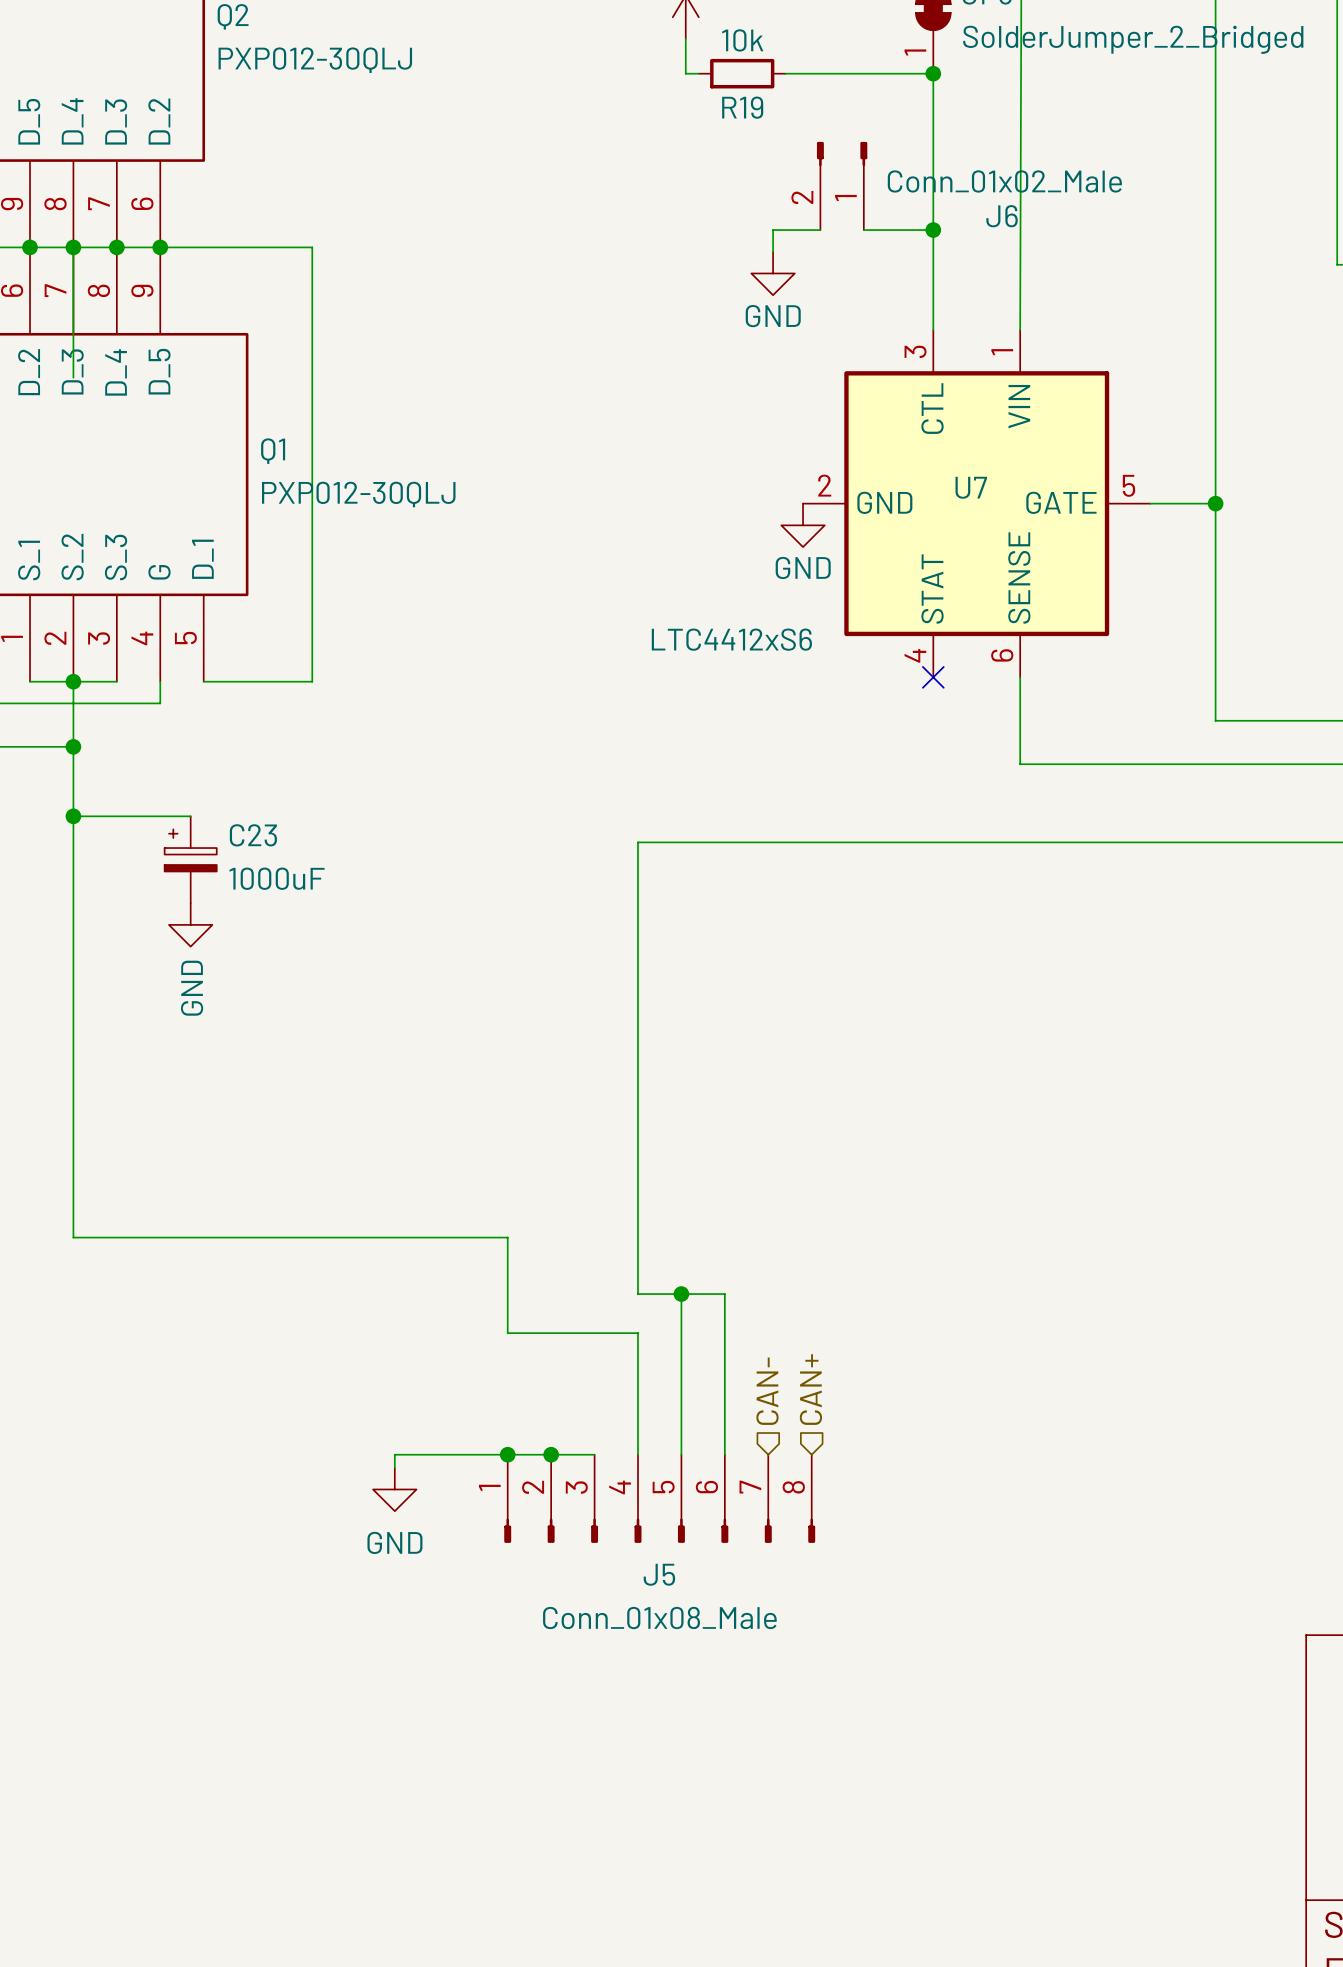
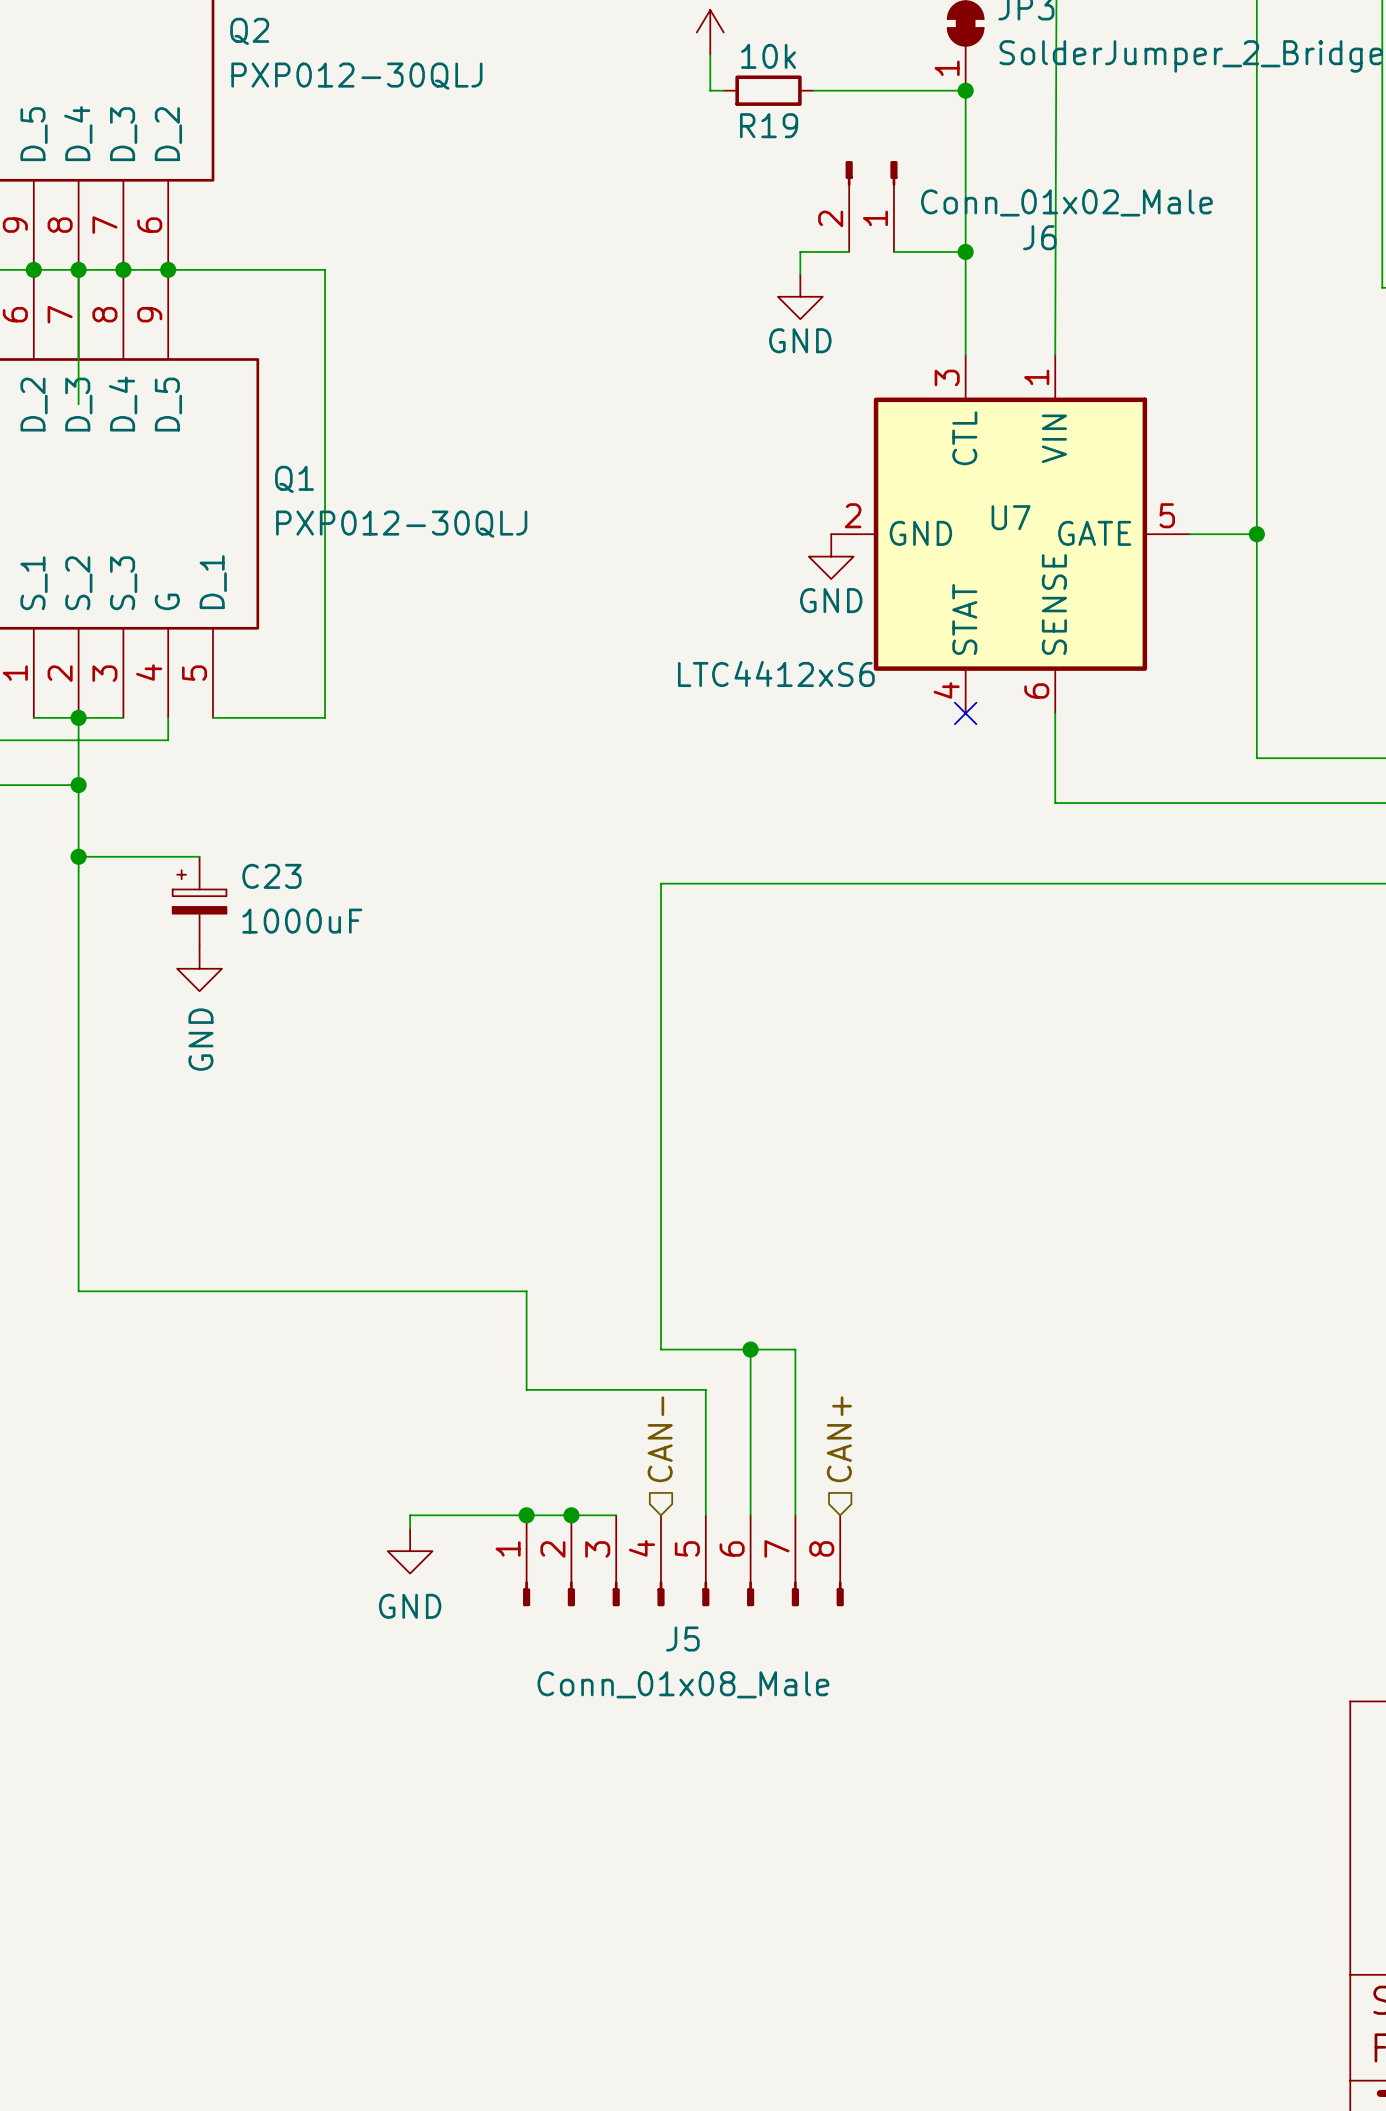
wire: (681, 1294) (681, 1333) -> (661, 1389) (705, 1389)
junction position: (681, 1294) -> (750, 1349)
wire: none -> (750, 1349) (795, 1349) (795, 1515)
wire: (638, 1333) (638, 1454) -> none
hierarchical label position: CAN- (767, 1391) -> CAN- (660, 1439)

